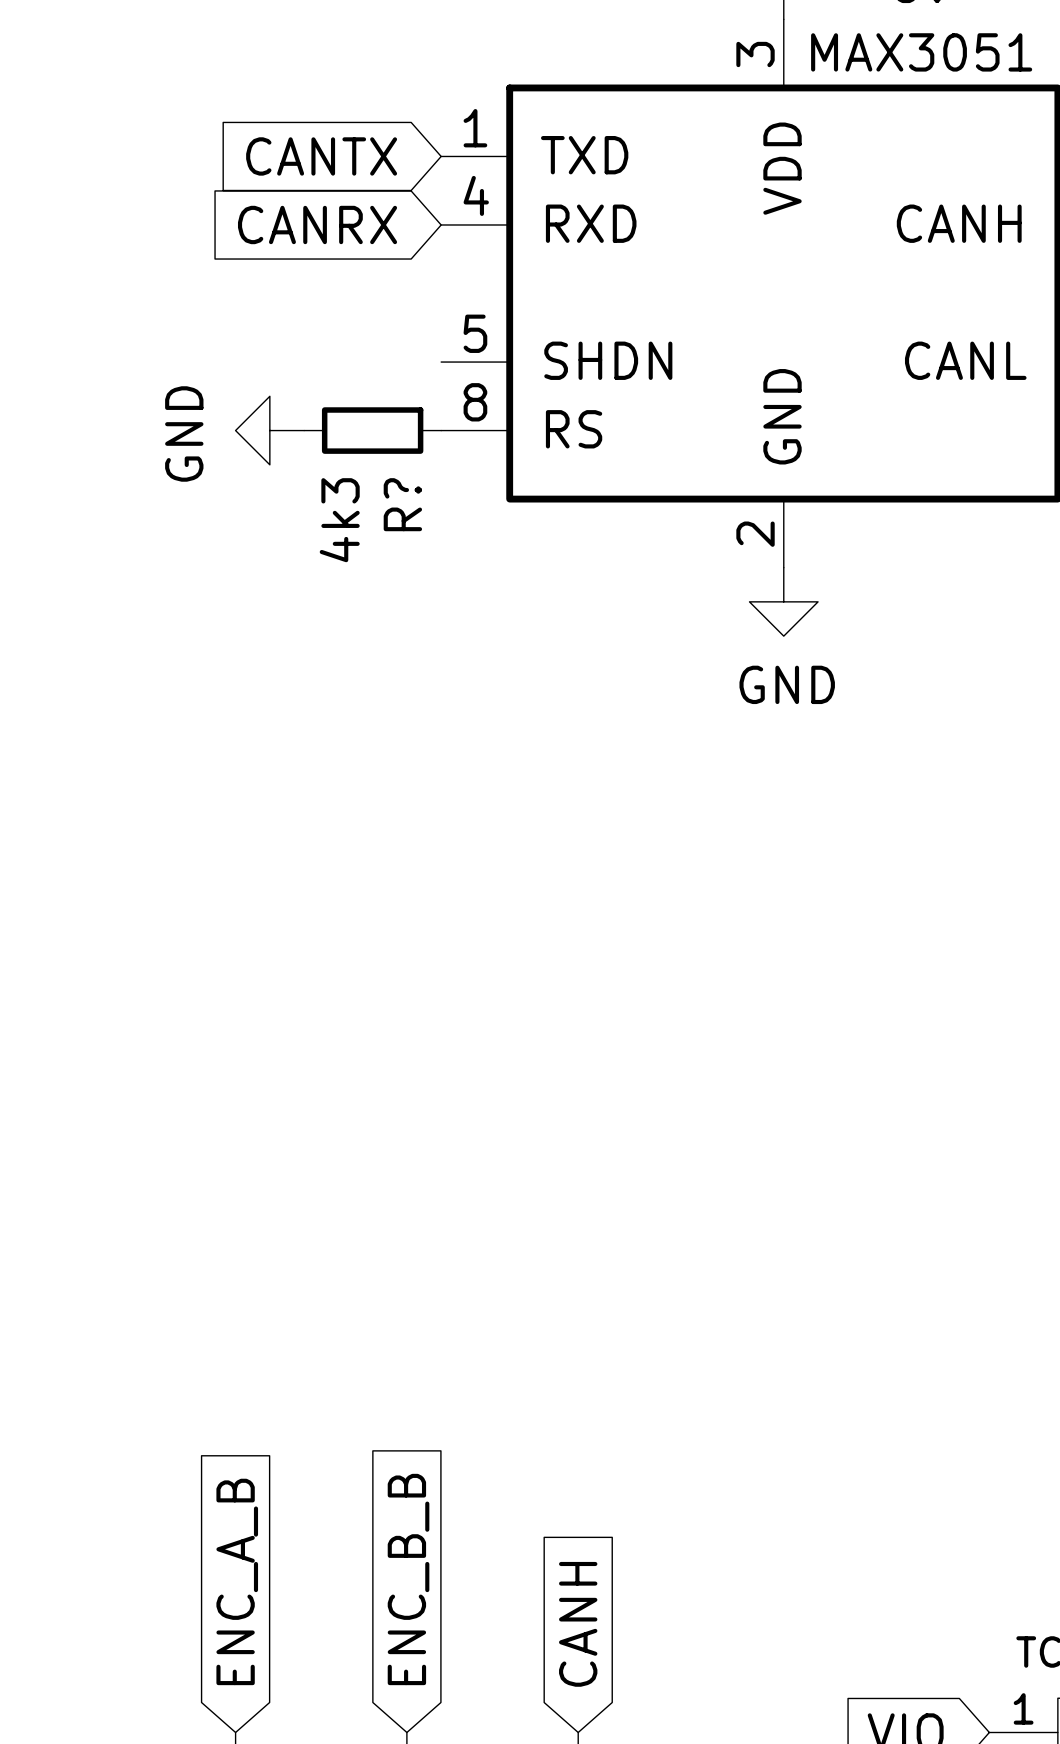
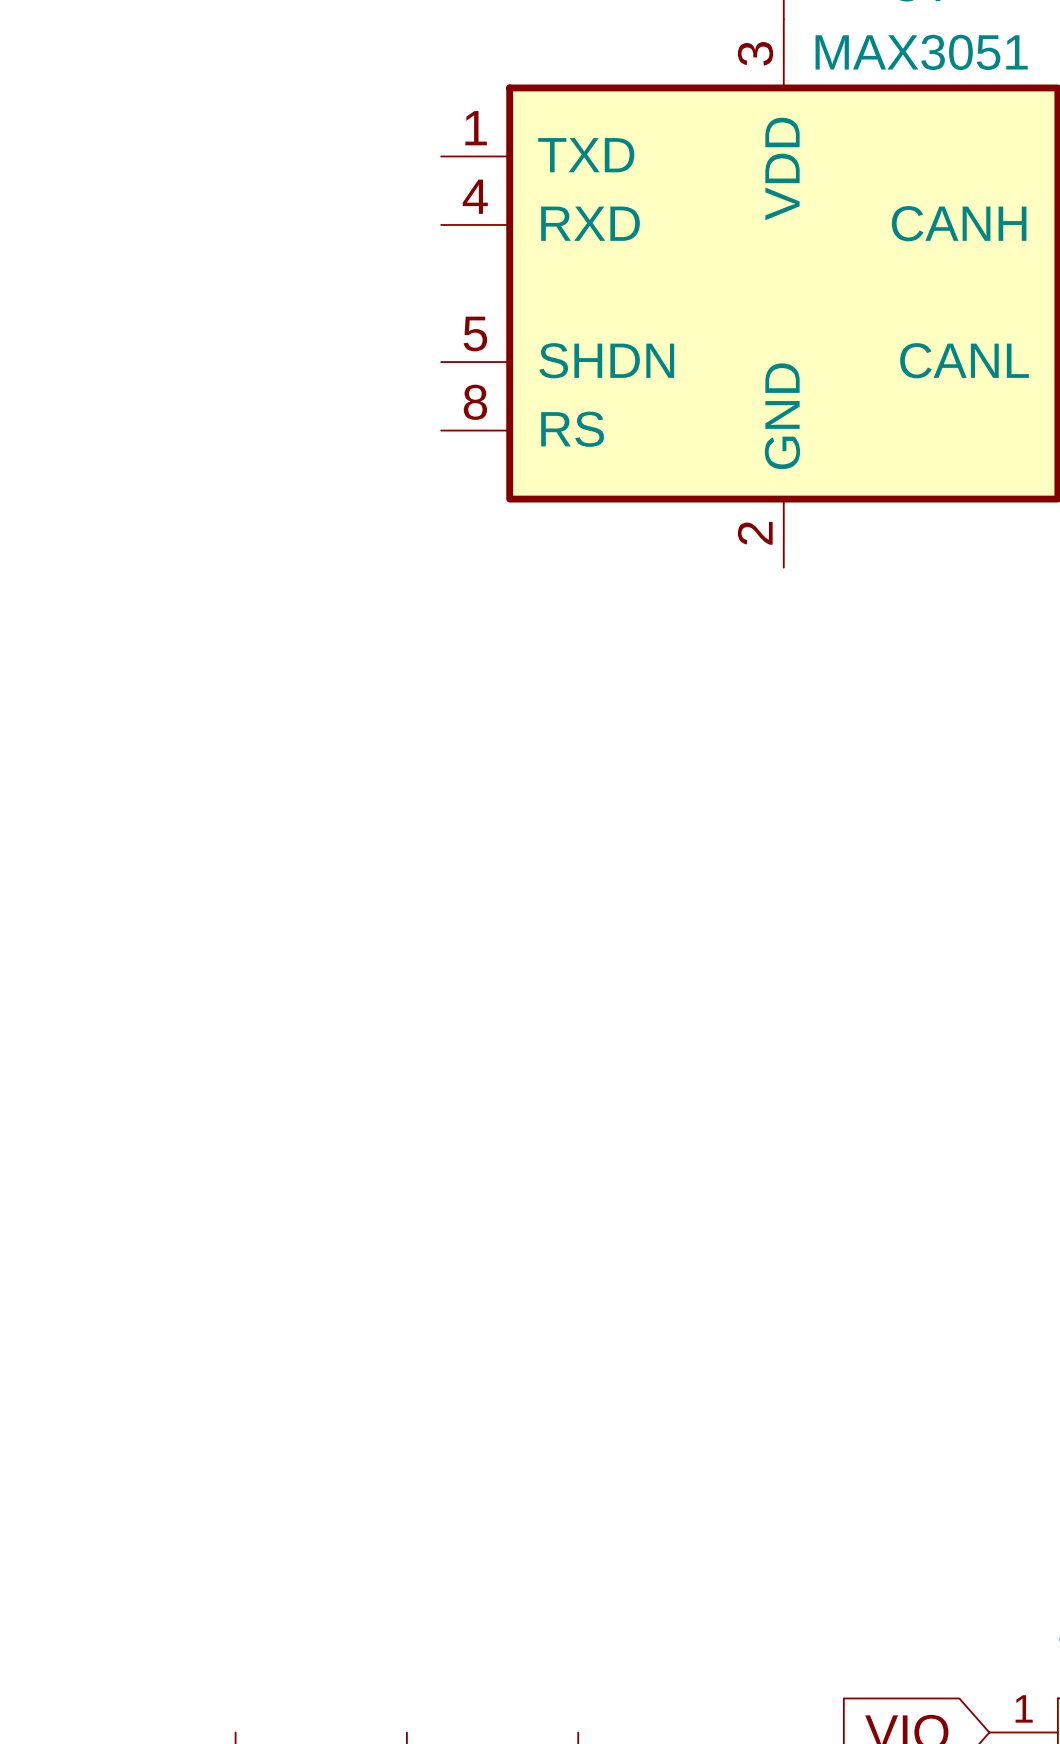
global label: CANTX (321, 156) -> none
global label: CANRX (317, 224) -> none
power symbol: GND (269, 430) -> none
R?: 4k3 (372, 430) -> none
power symbol: GND (783, 601) -> none
global label: ENC_B_B (408, 1579) -> none
global label: ENC_A_B (237, 1581) -> none
global label: CANH (578, 1624) -> none

